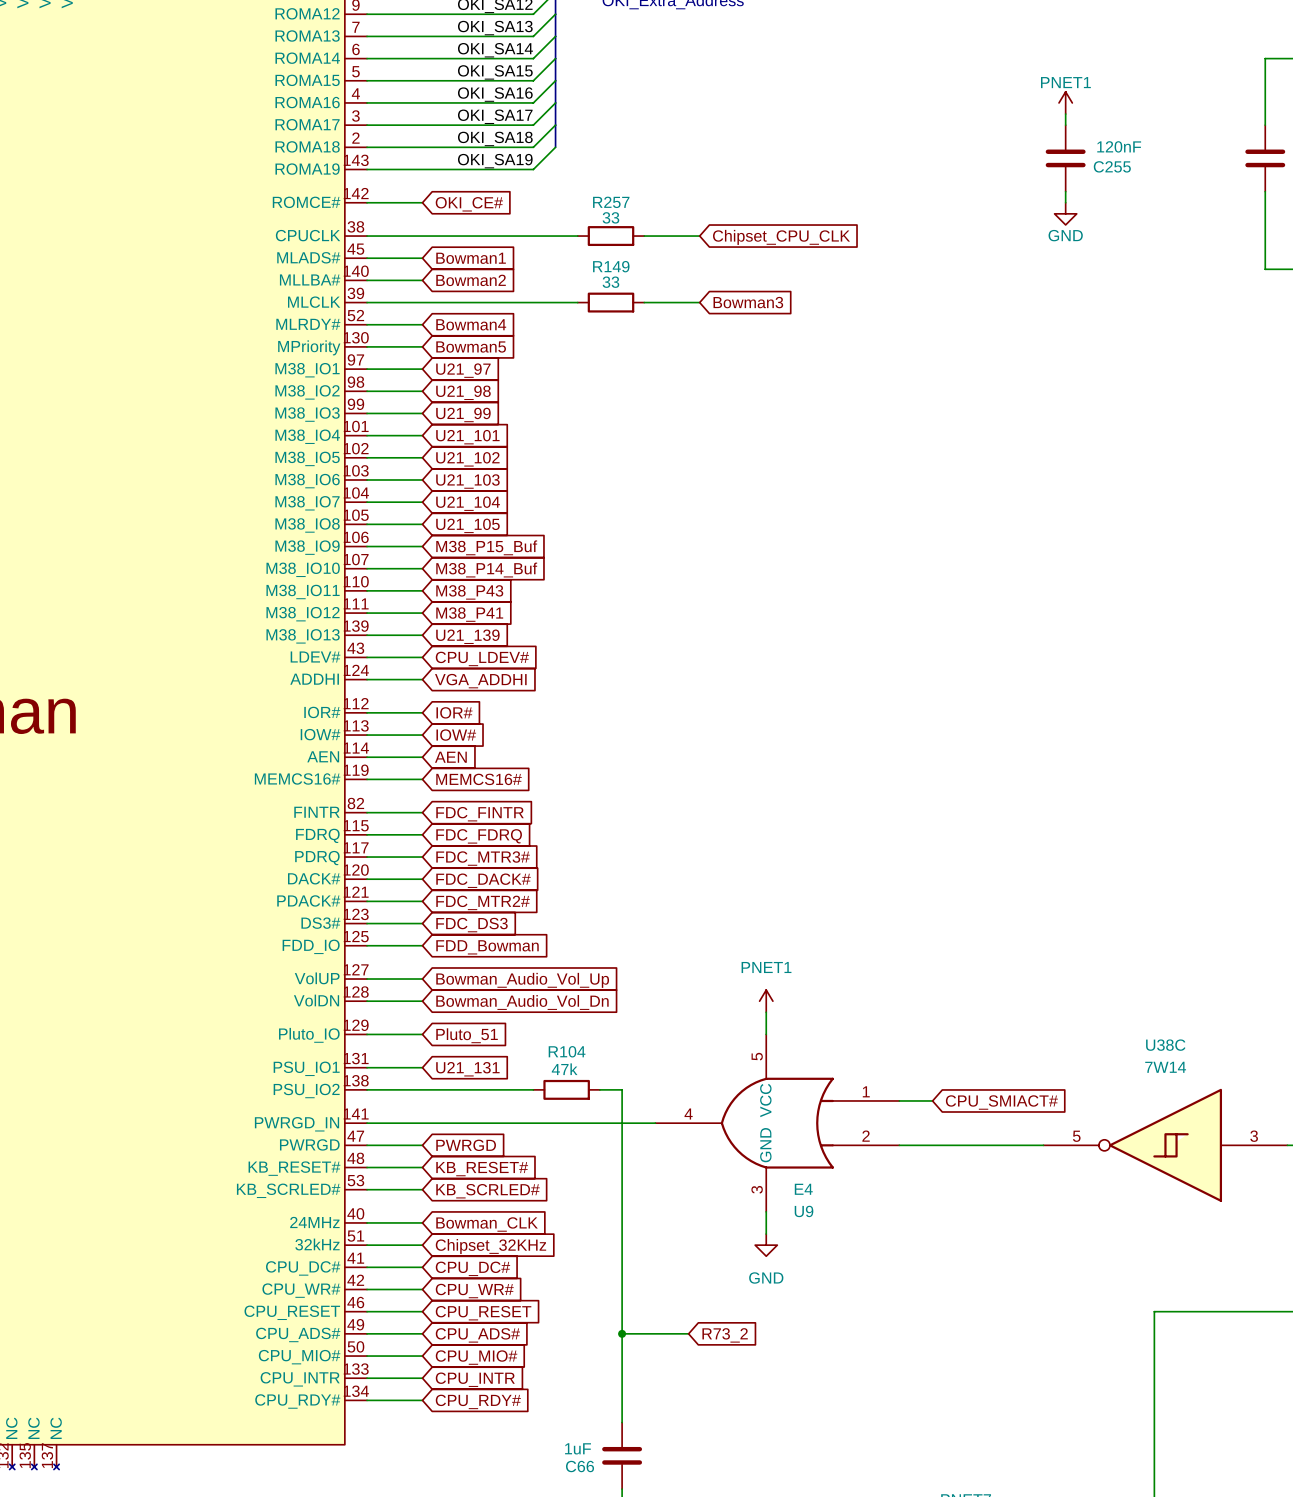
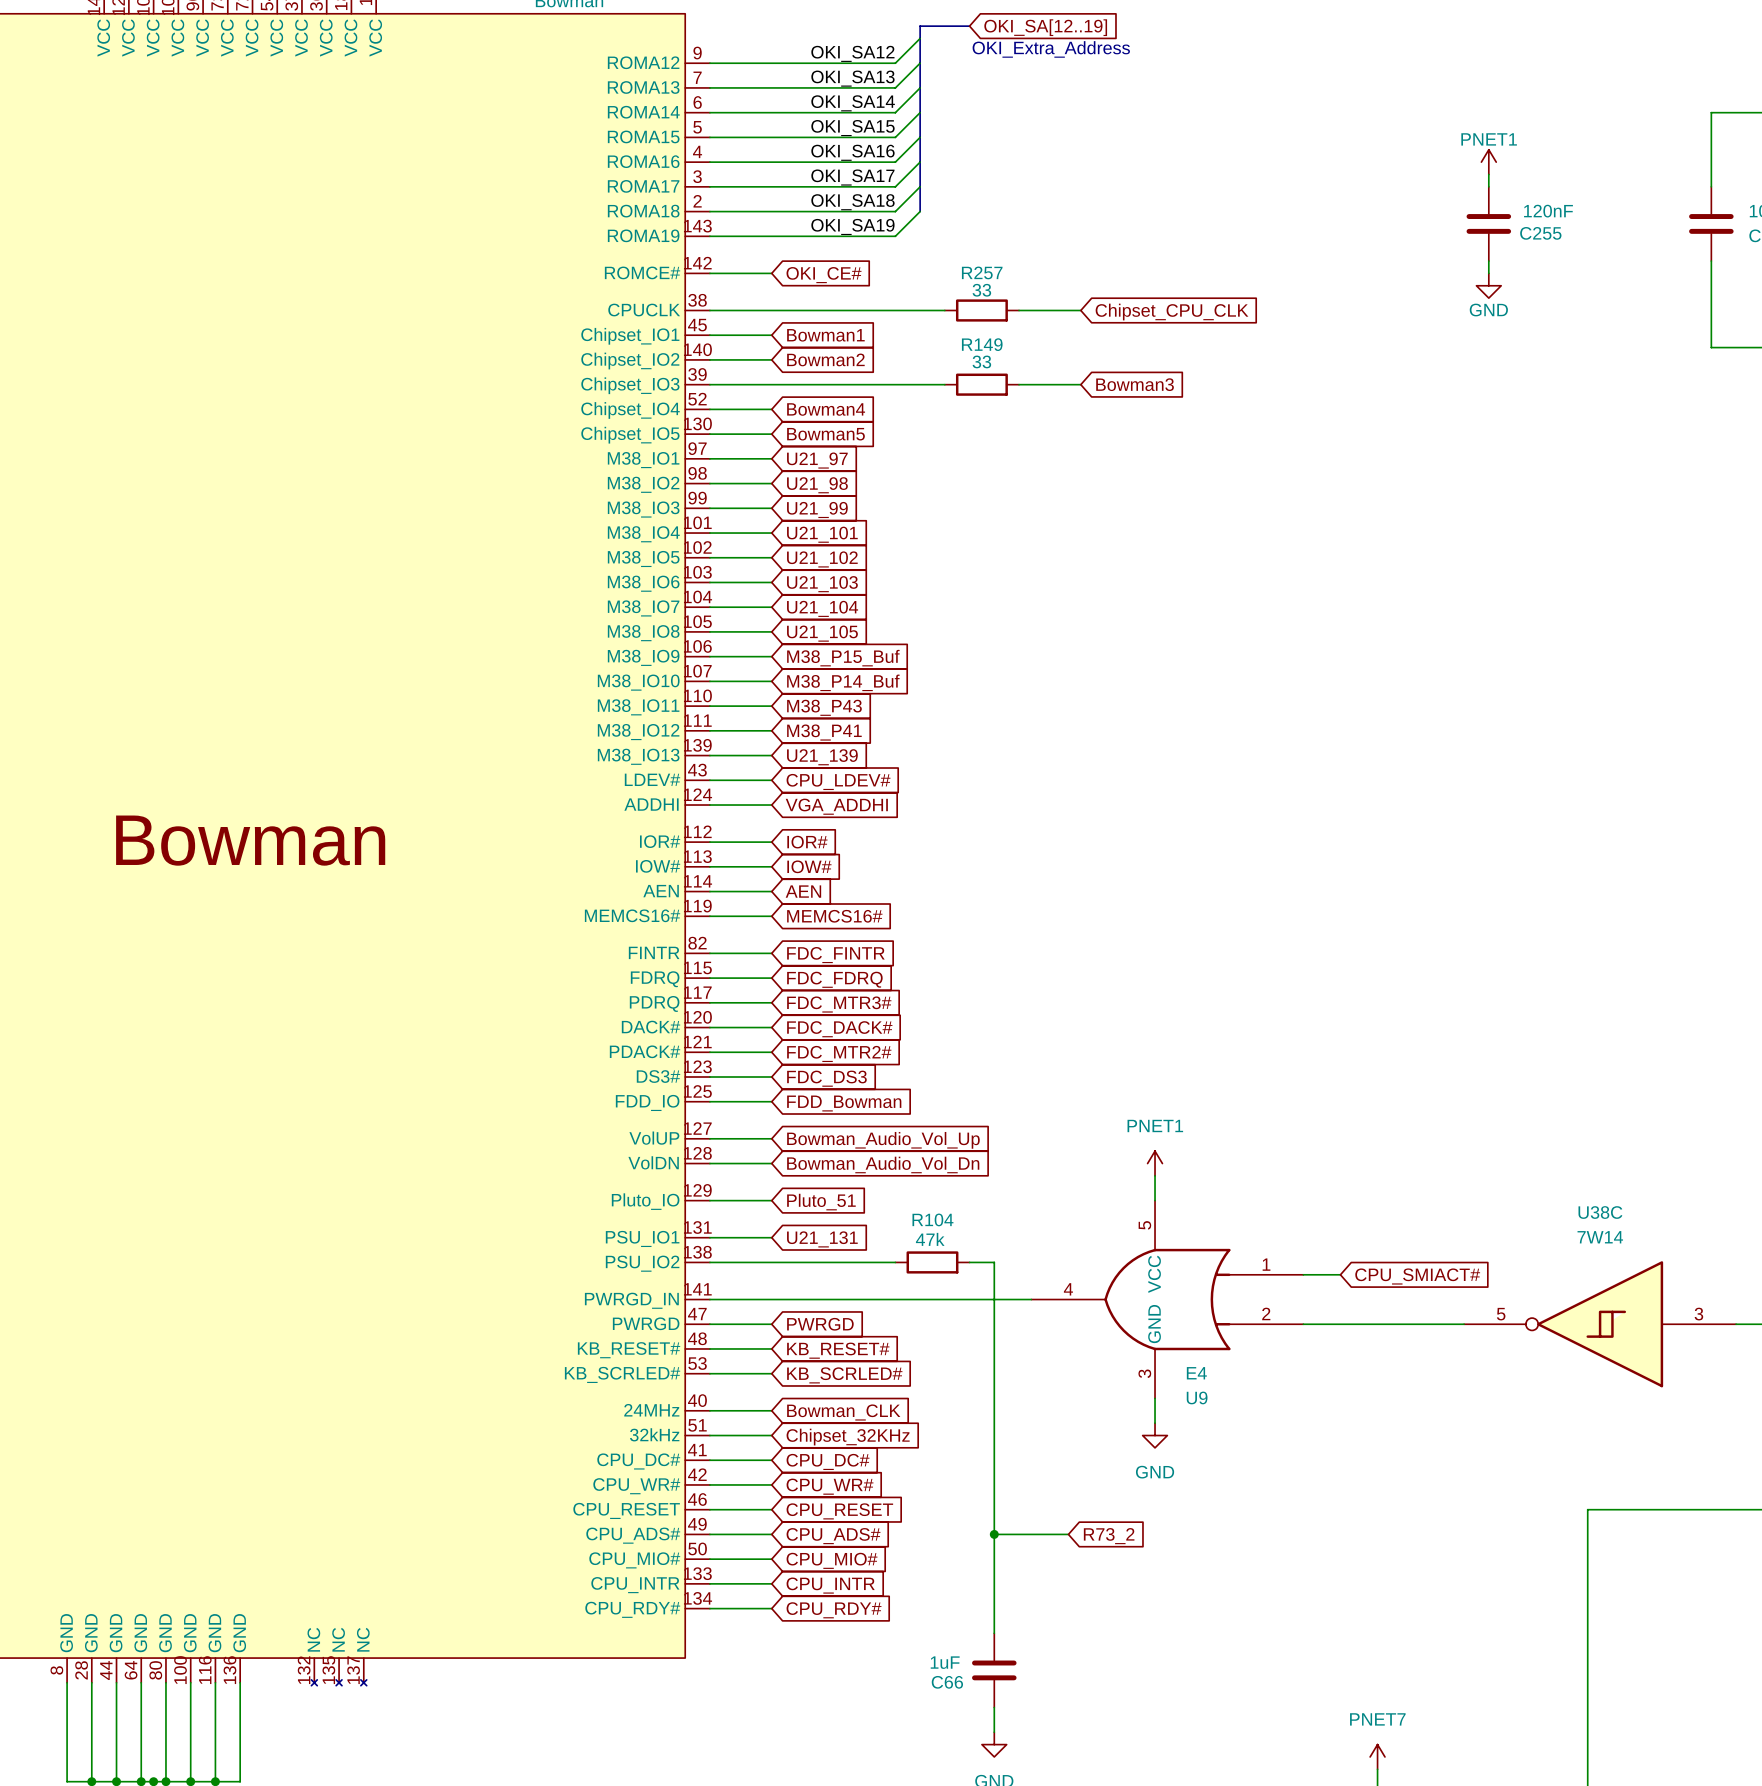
part pin name: MLADS# (308, 257) -> Chipset_IO1 (630, 336)
part pin name: MLLBA# (310, 279) -> Chipset_IO2 (630, 361)
part pin name: MLCLK (314, 302) -> Chipset_IO3 (630, 385)
part pin name: MLRDY# (308, 324) -> Chipset_IO4 (630, 410)
part pin name: MPriority (309, 347) -> Chipset_IO5 (630, 435)

